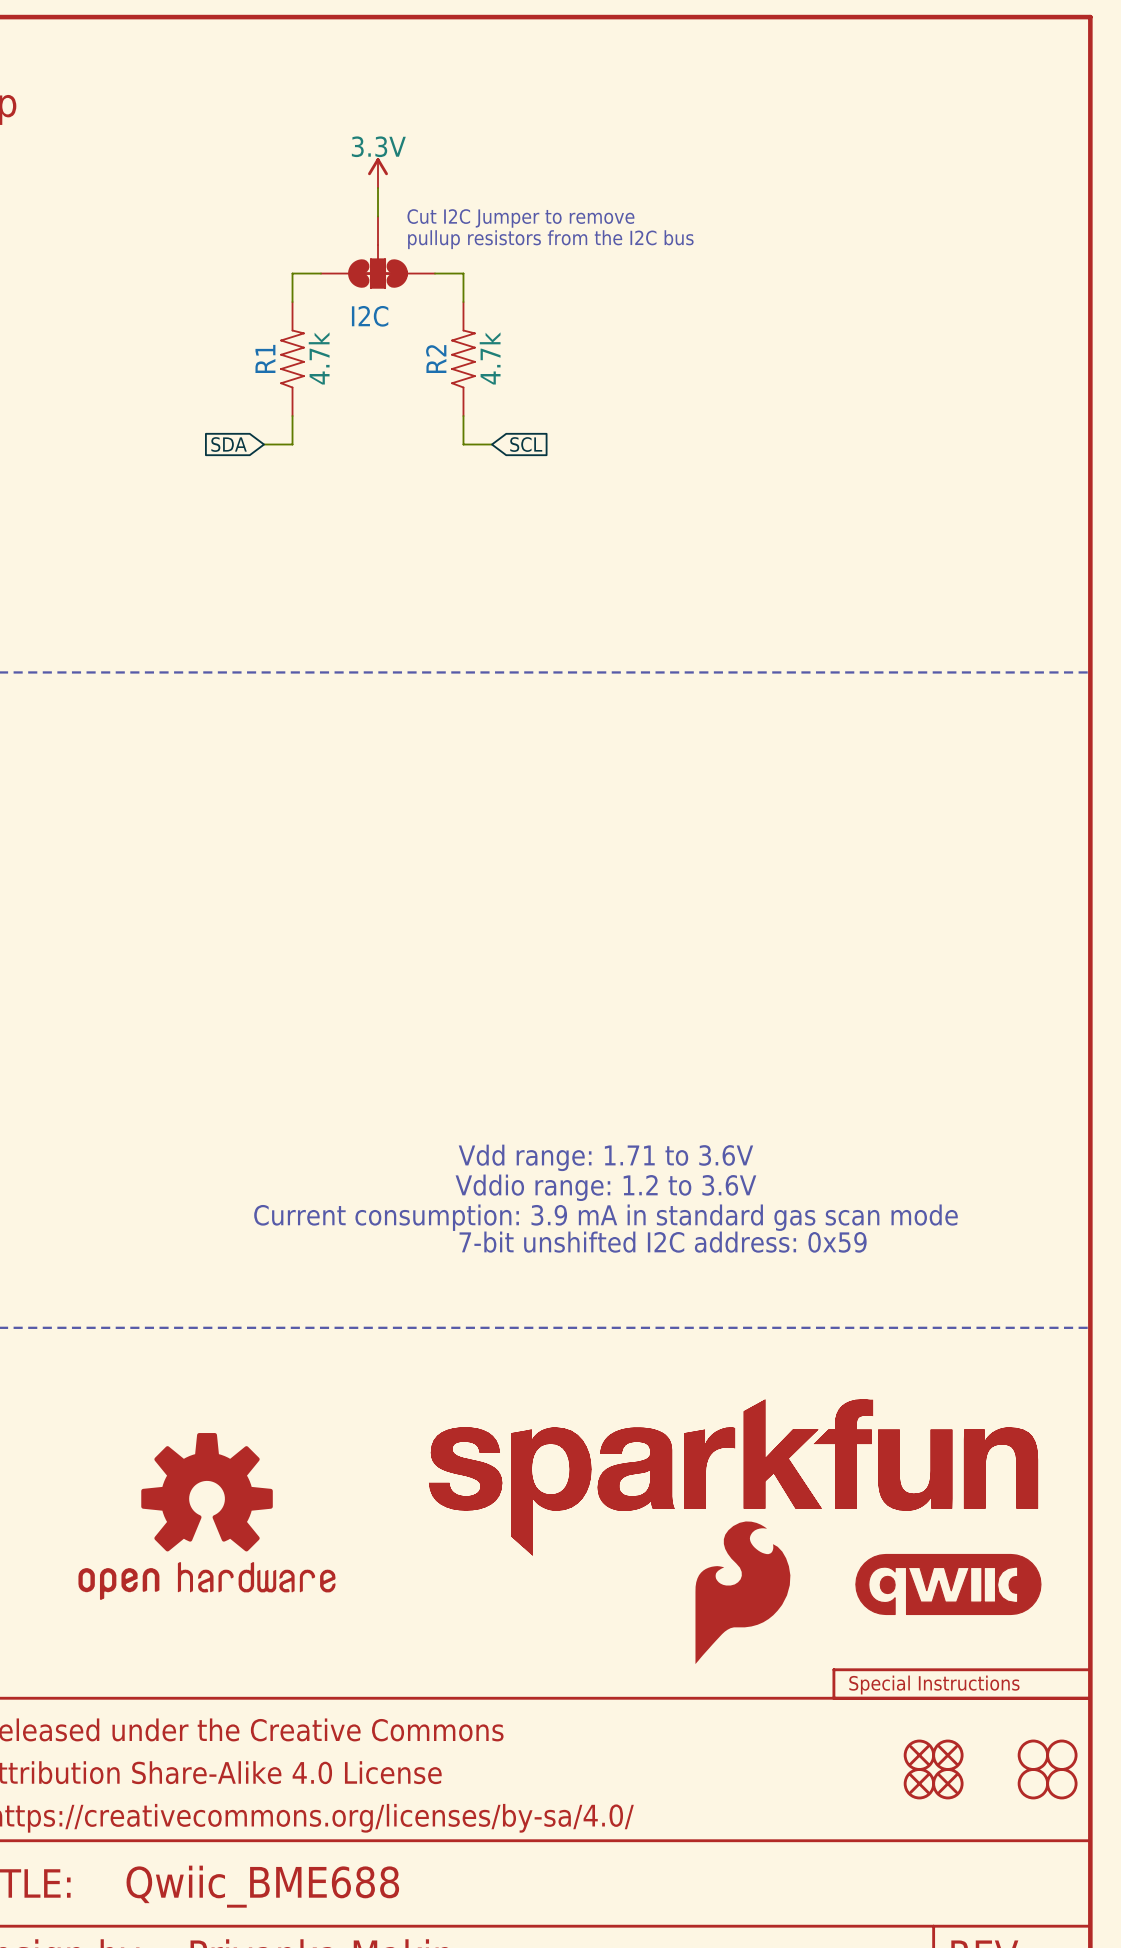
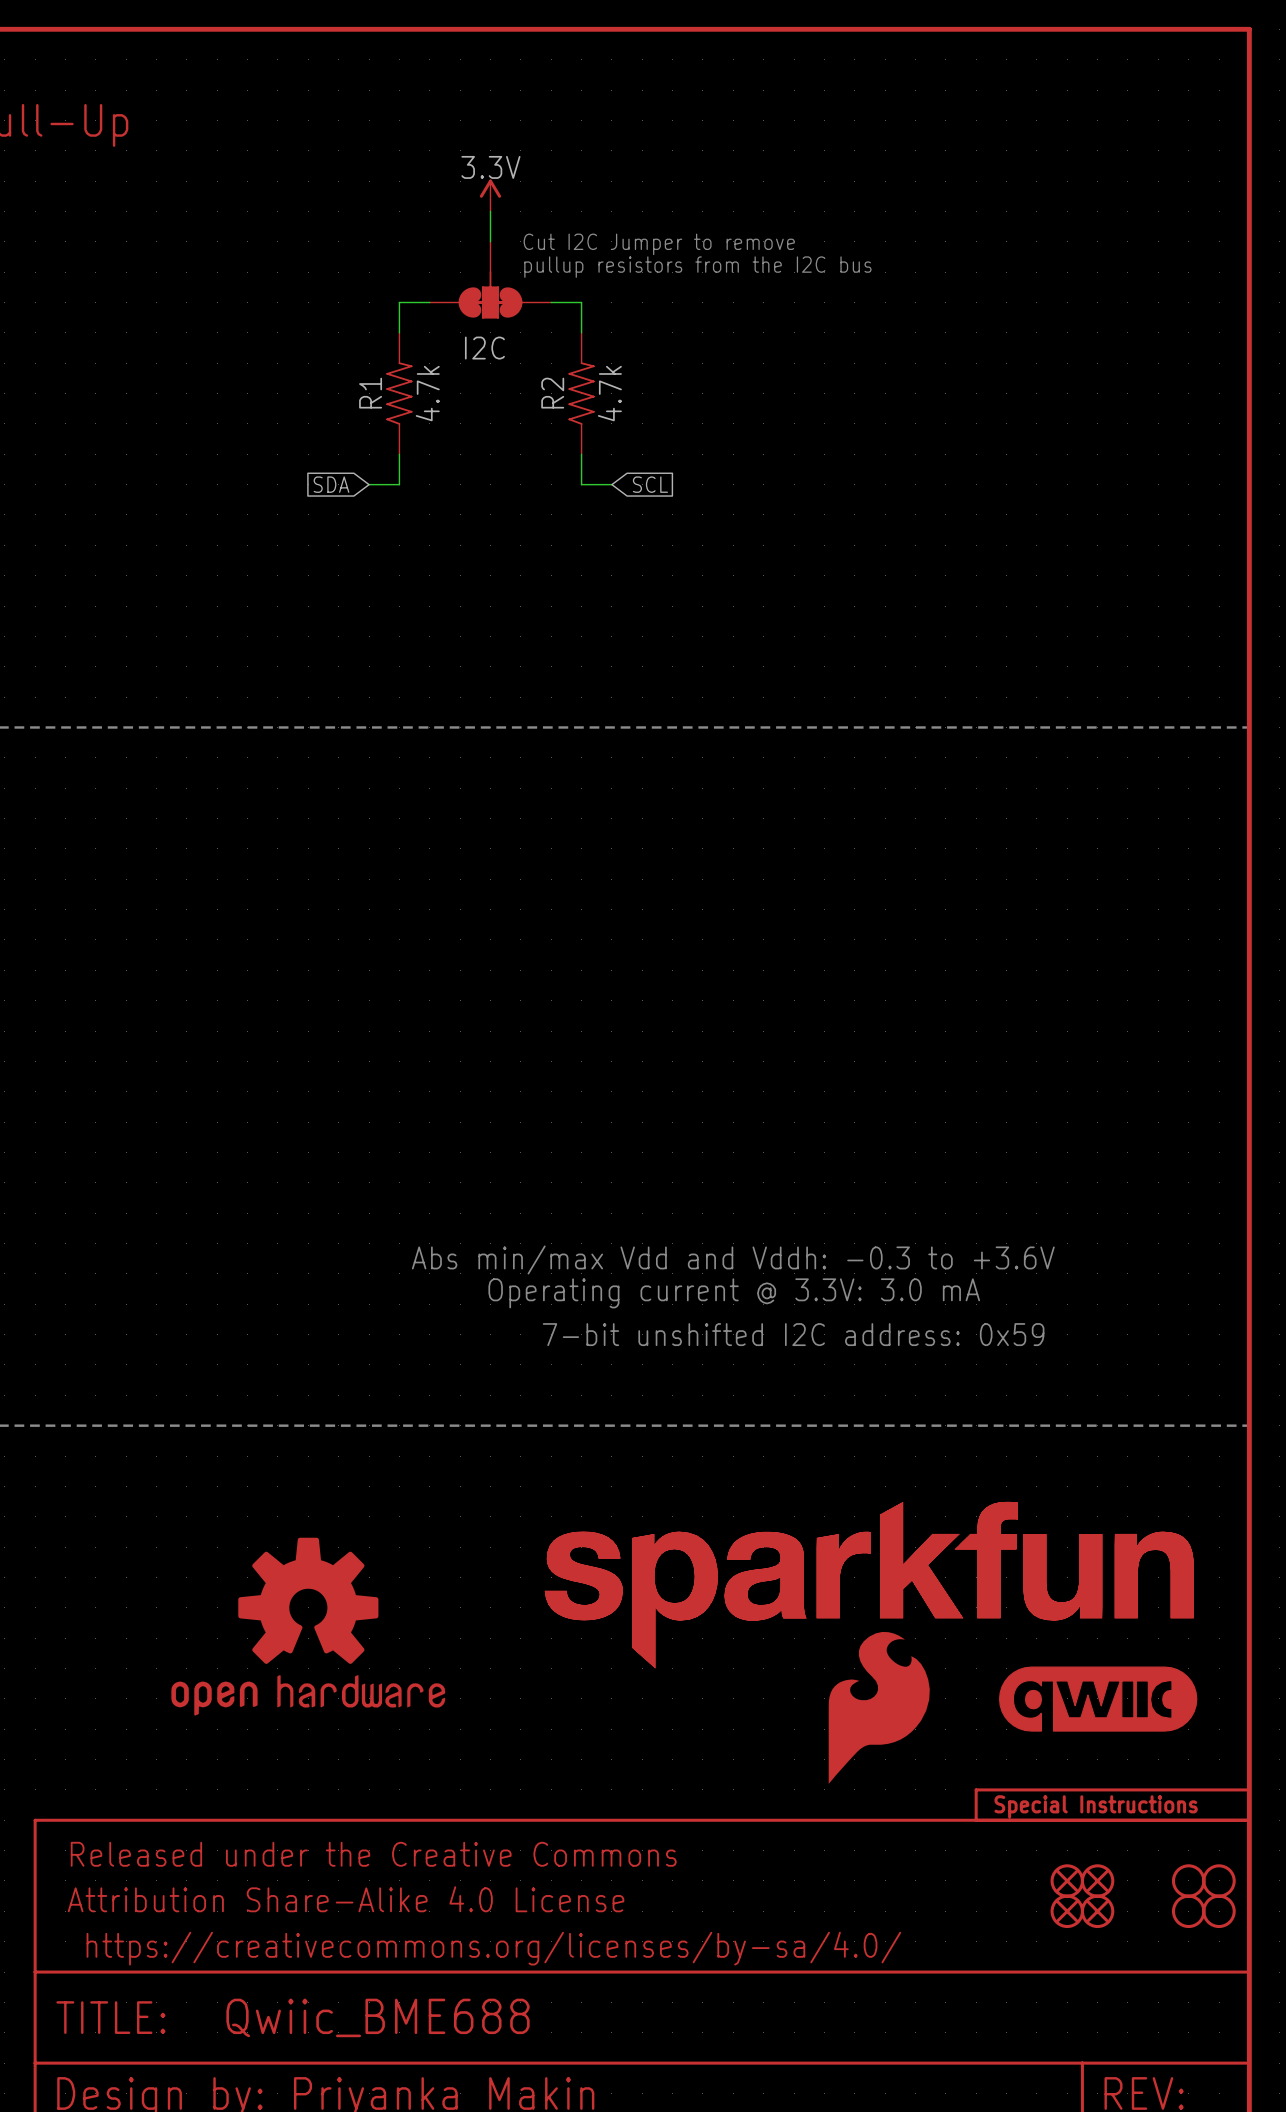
text: Vdd range: 1.71 to 3.6V (605, 1157) -> none
text: none -> Abs min/max Vdd and Vddh: -0.3 to +3.6V (733, 1259)
text: Vddio range: 1.2 to 3.6V (605, 1187) -> none
text: none -> Operating current @ 3.3V: 3.0 mA (734, 1293)
text: Current consumption: 3.9 mA in standard gas scan mode (605, 1217) -> none

